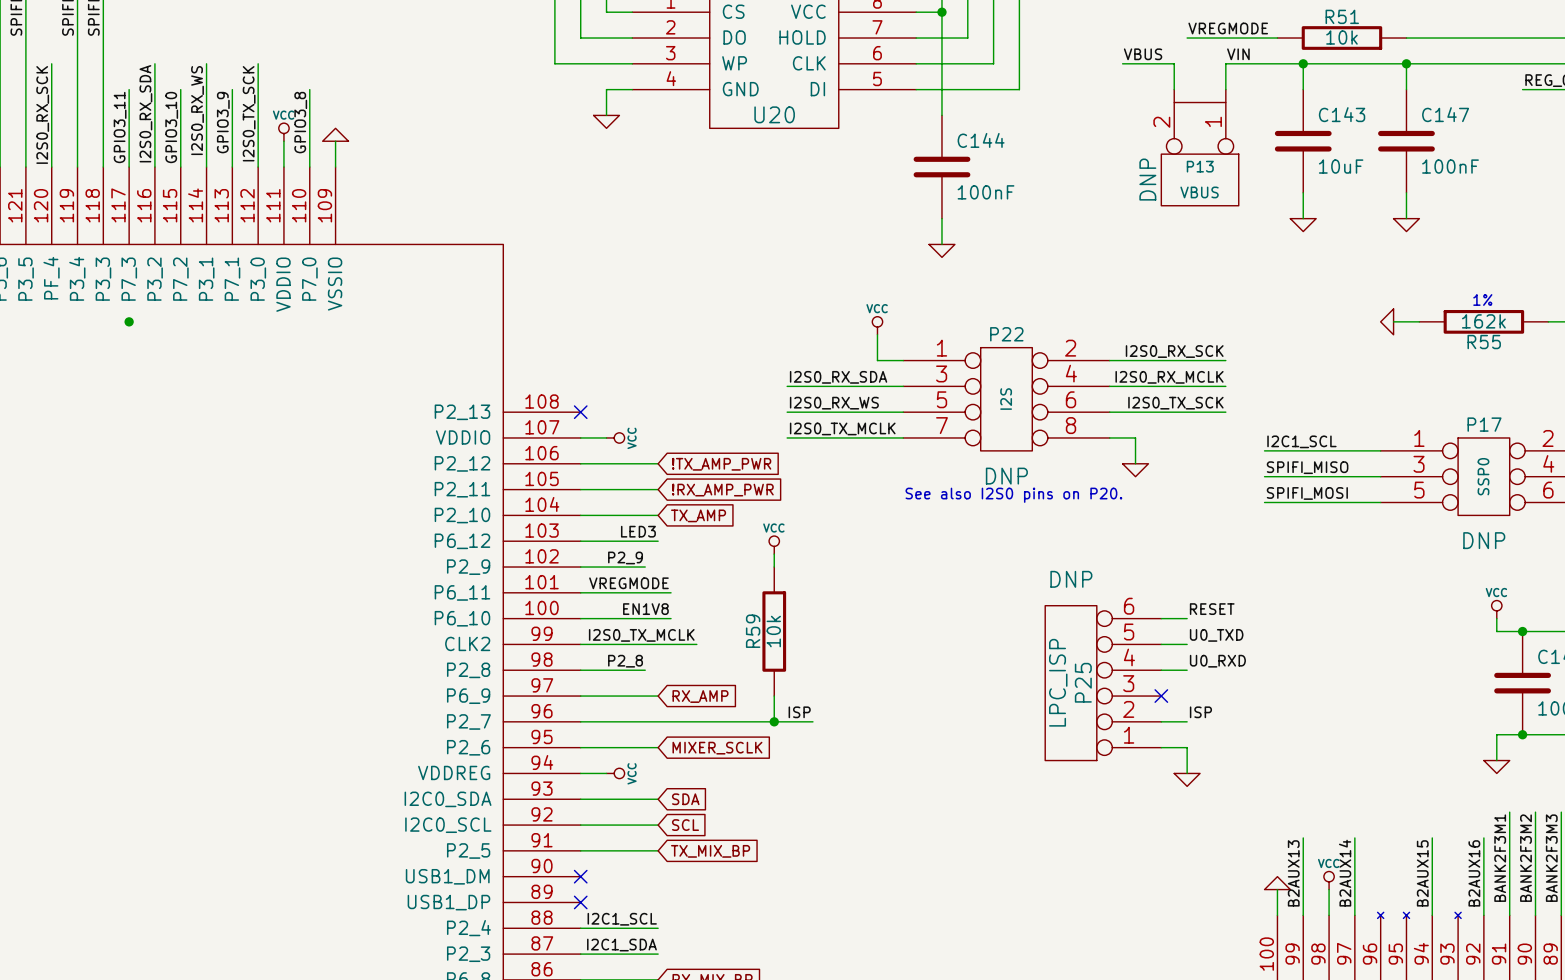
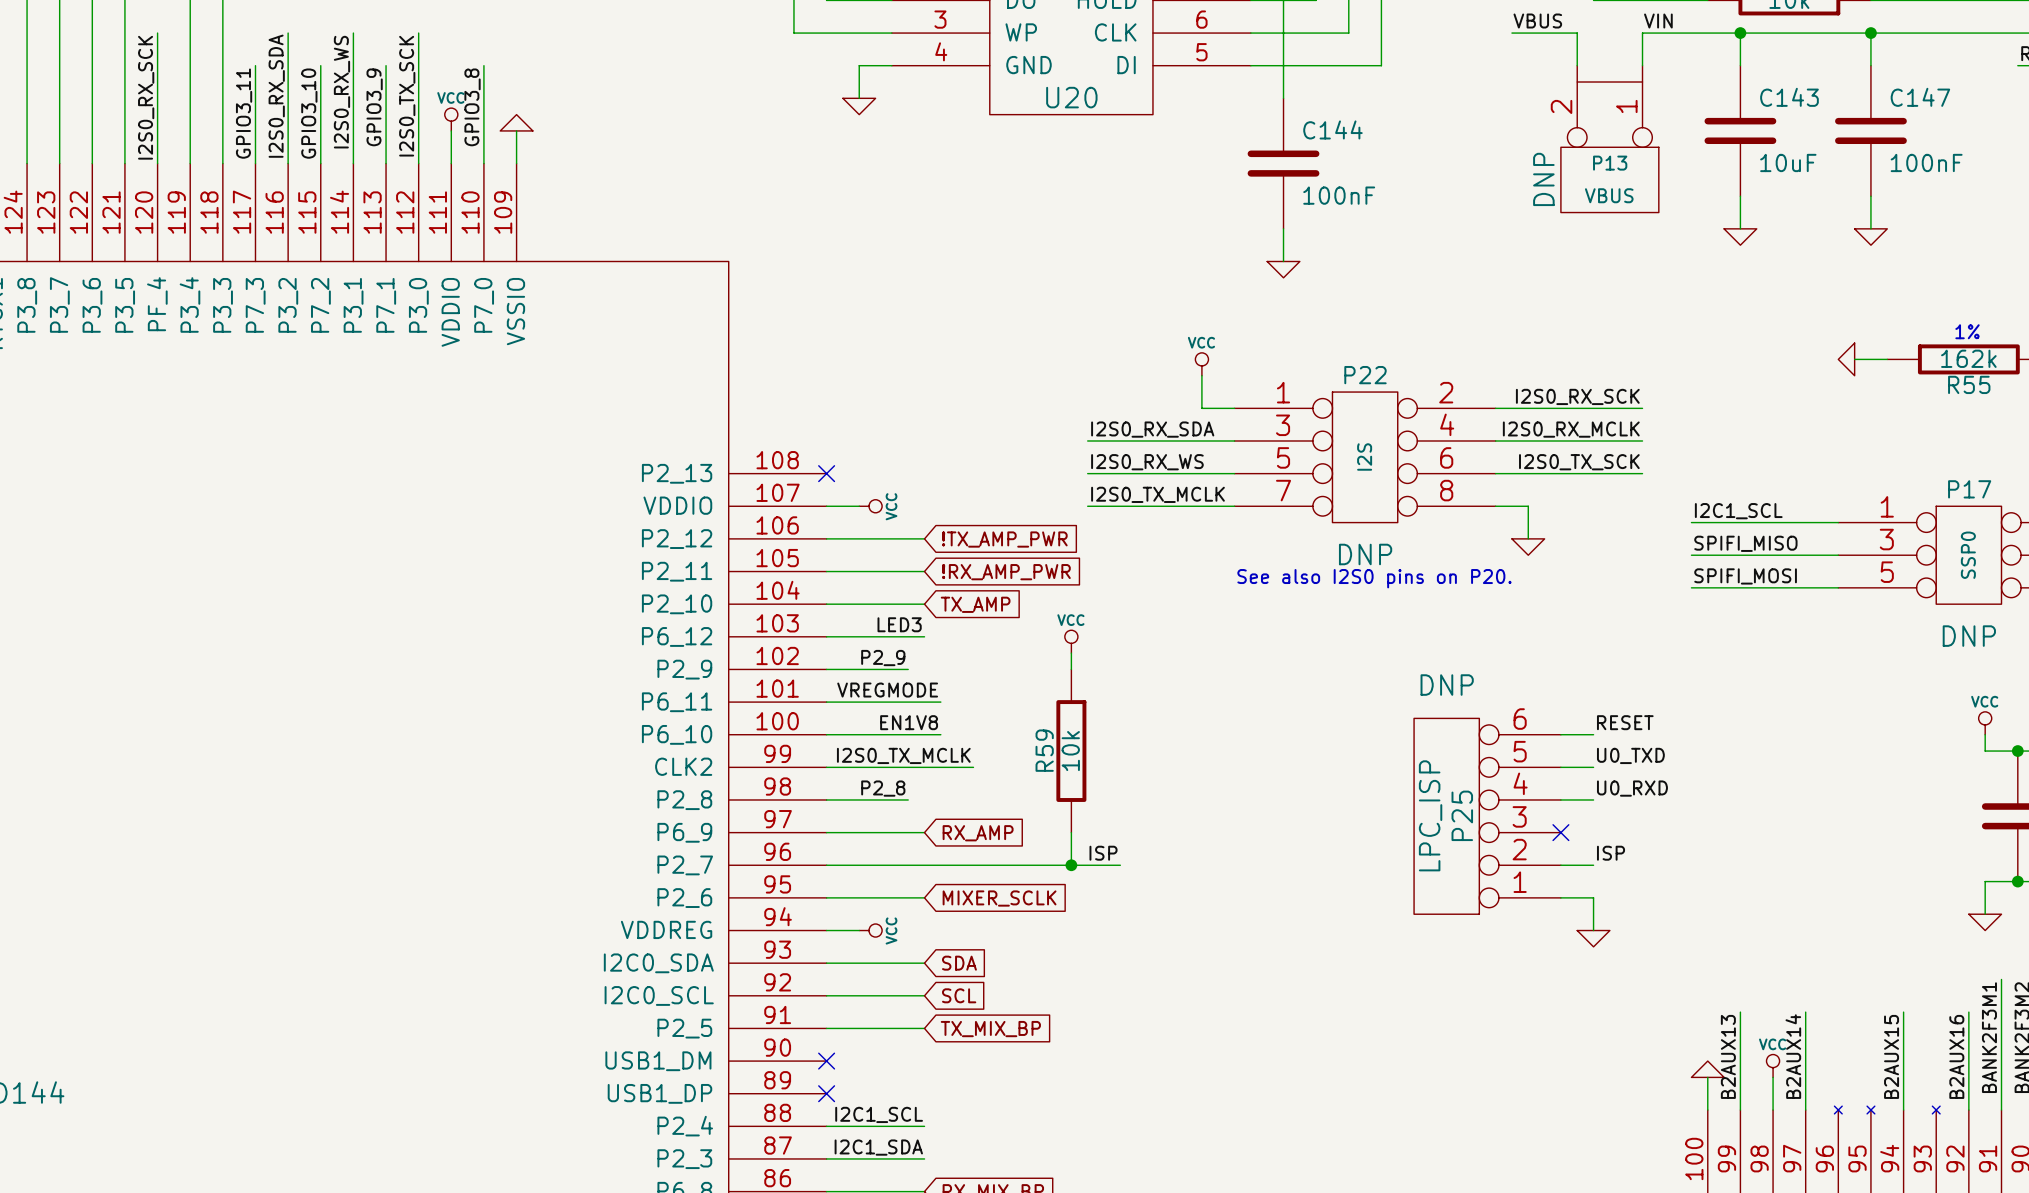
junction: (129, 321) -> none

